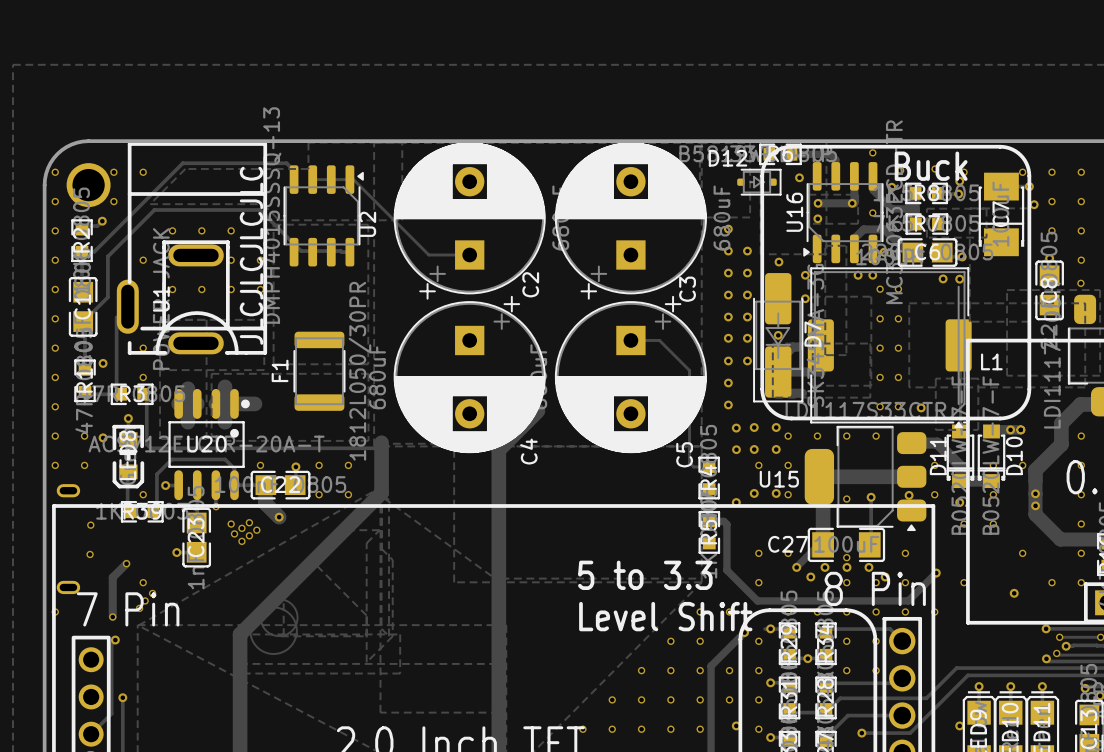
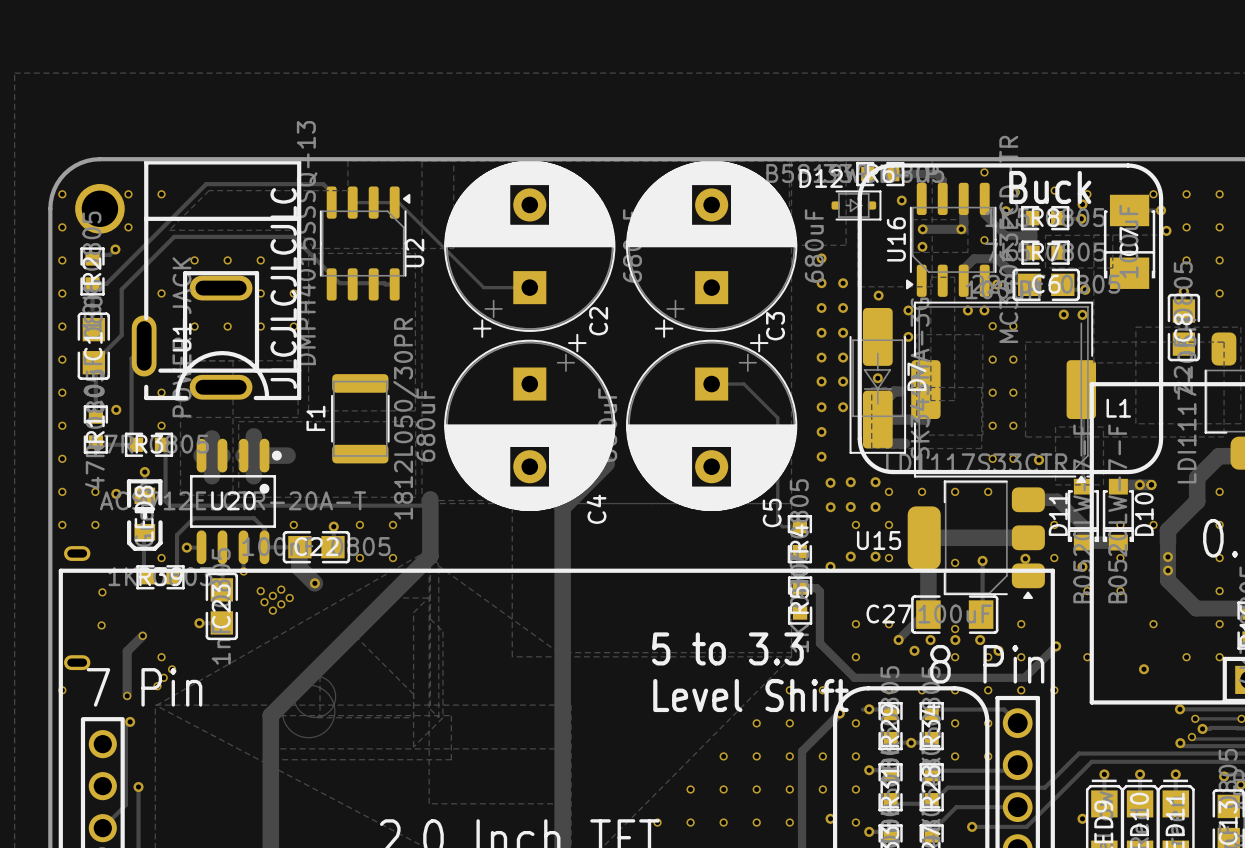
via: (1080, 283) -> none

